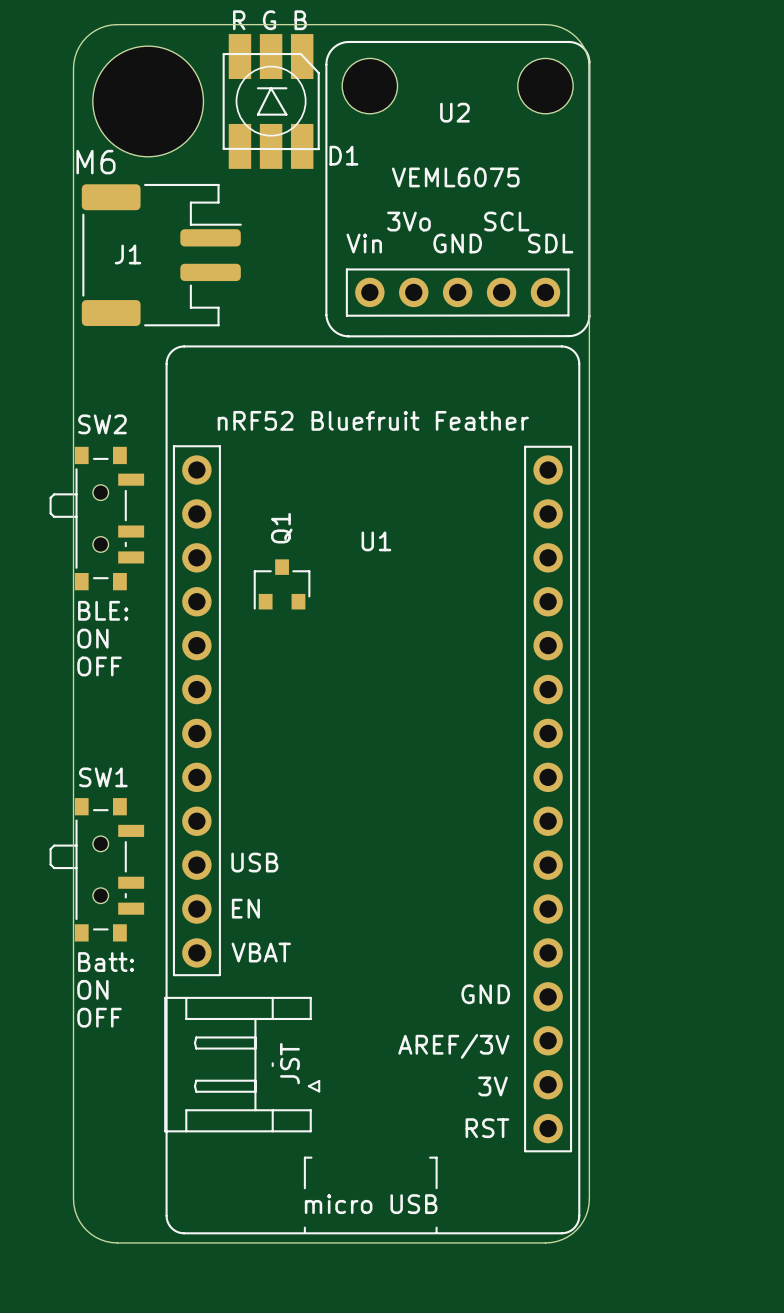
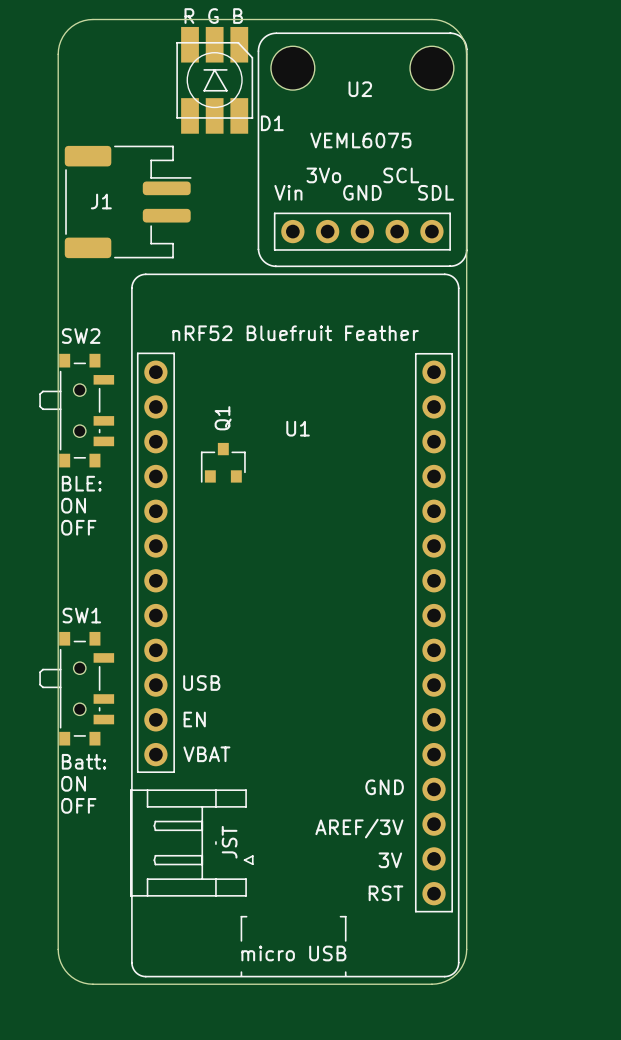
M6: (148, 101) -> none

